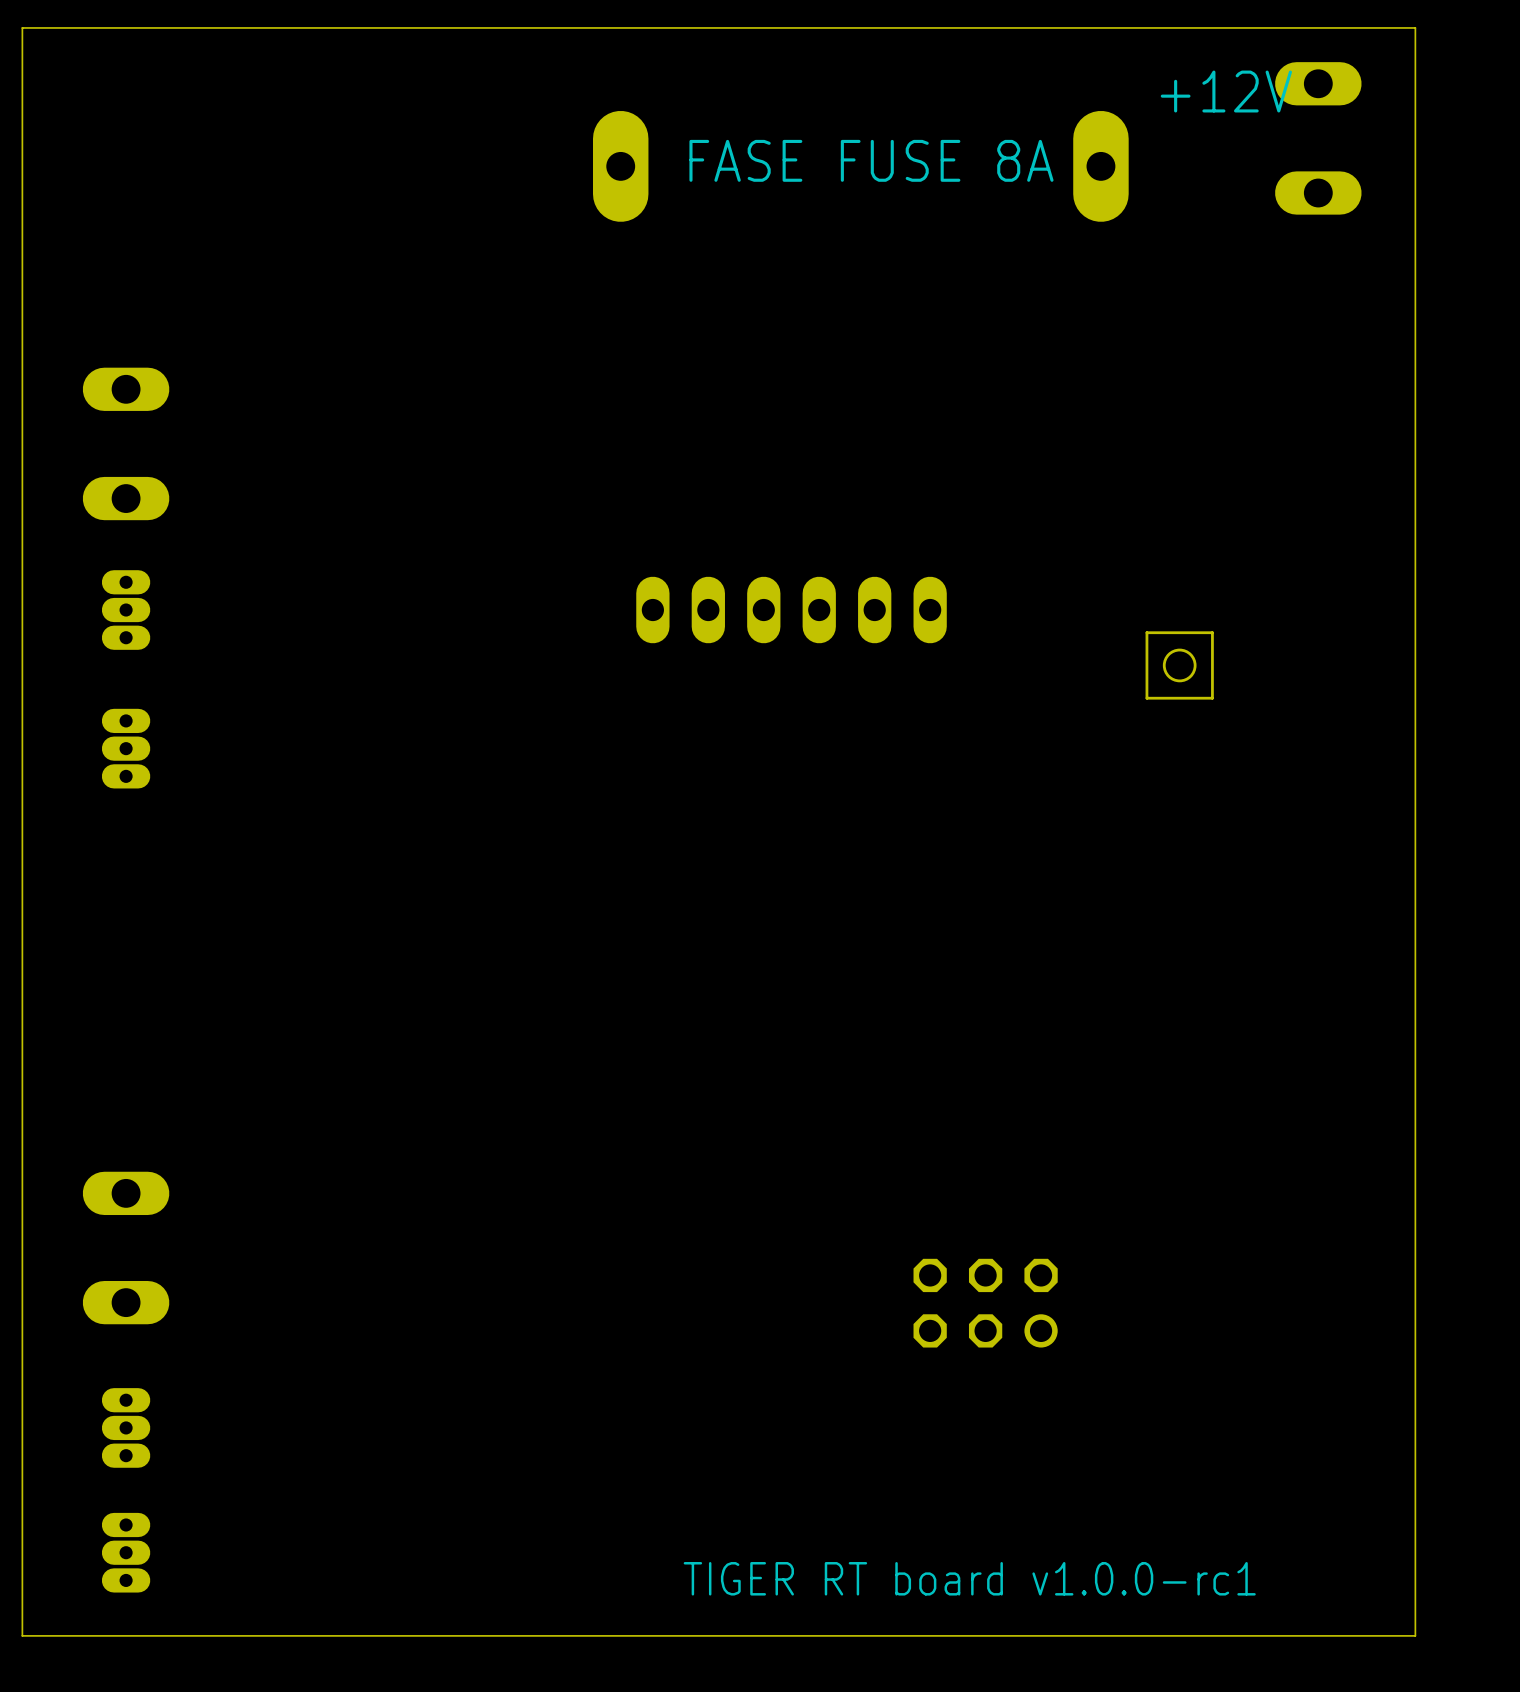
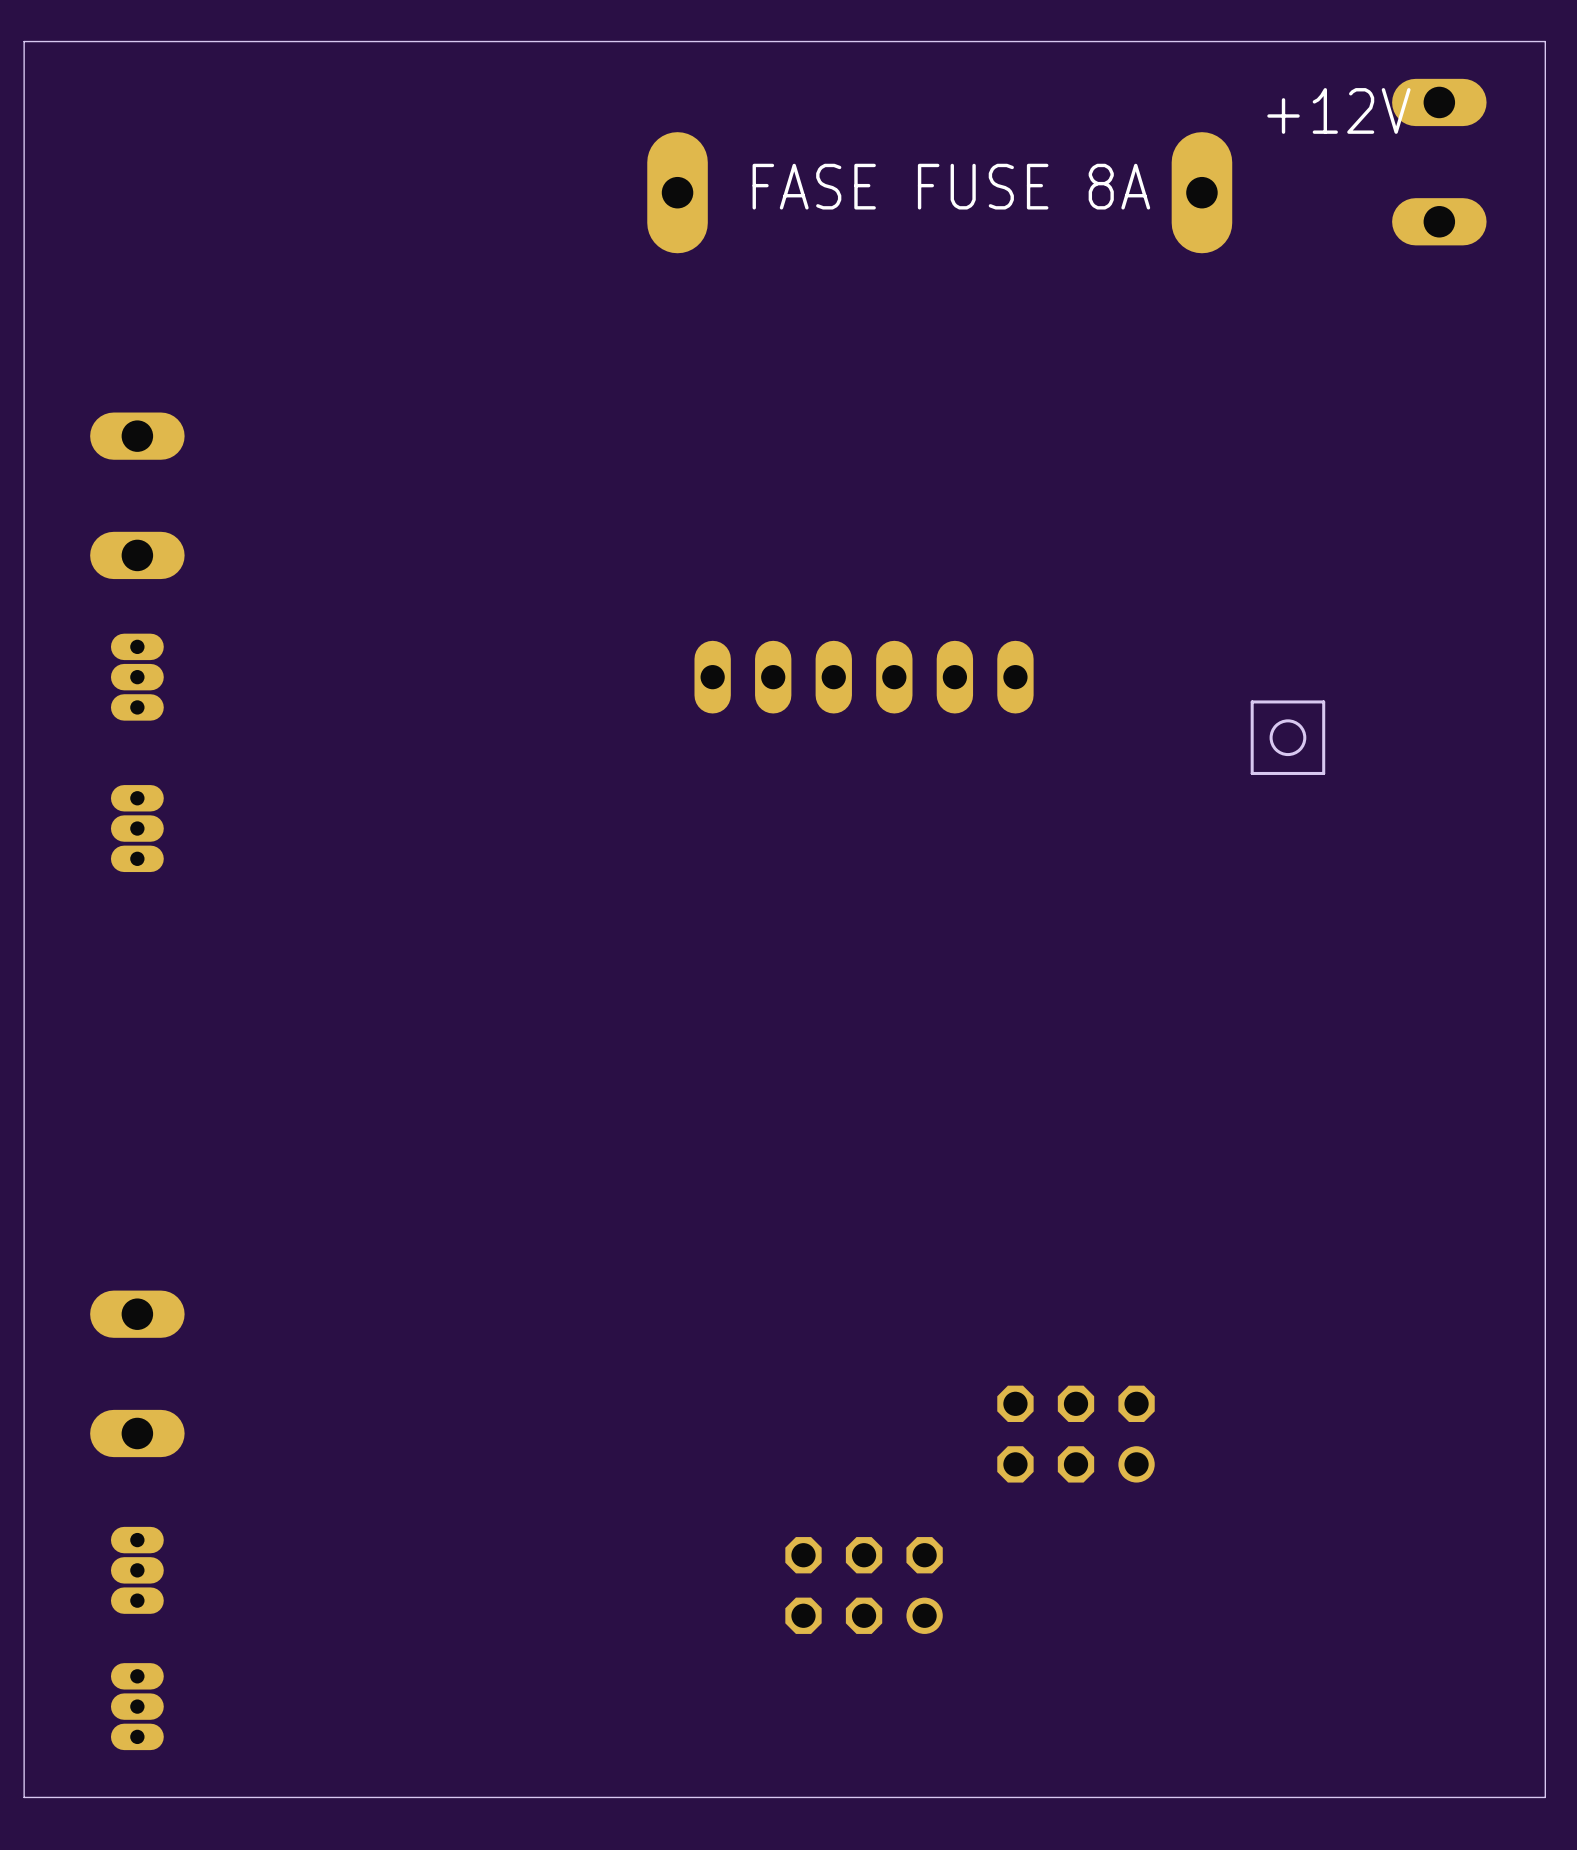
part: none -> (864, 1585)
text: TIGER RT board v1.0.0-rc1 (969, 1578) -> none

